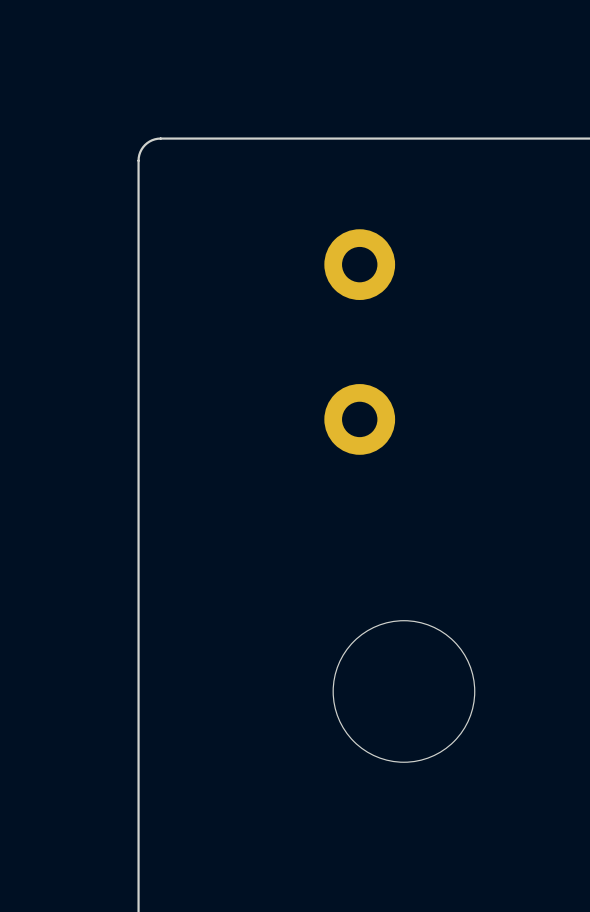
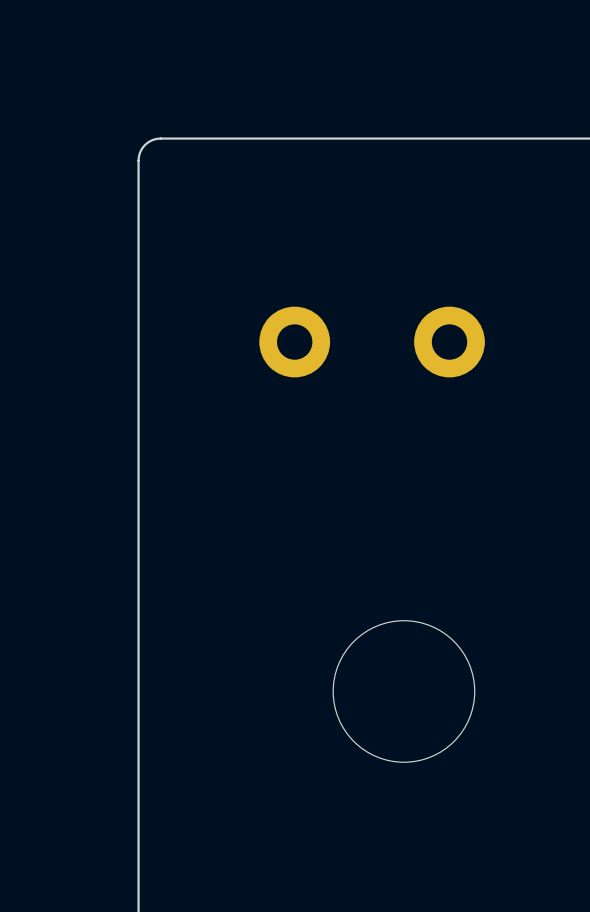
part rotation: 0° (359, 342) -> 90° clockwise (372, 342)

